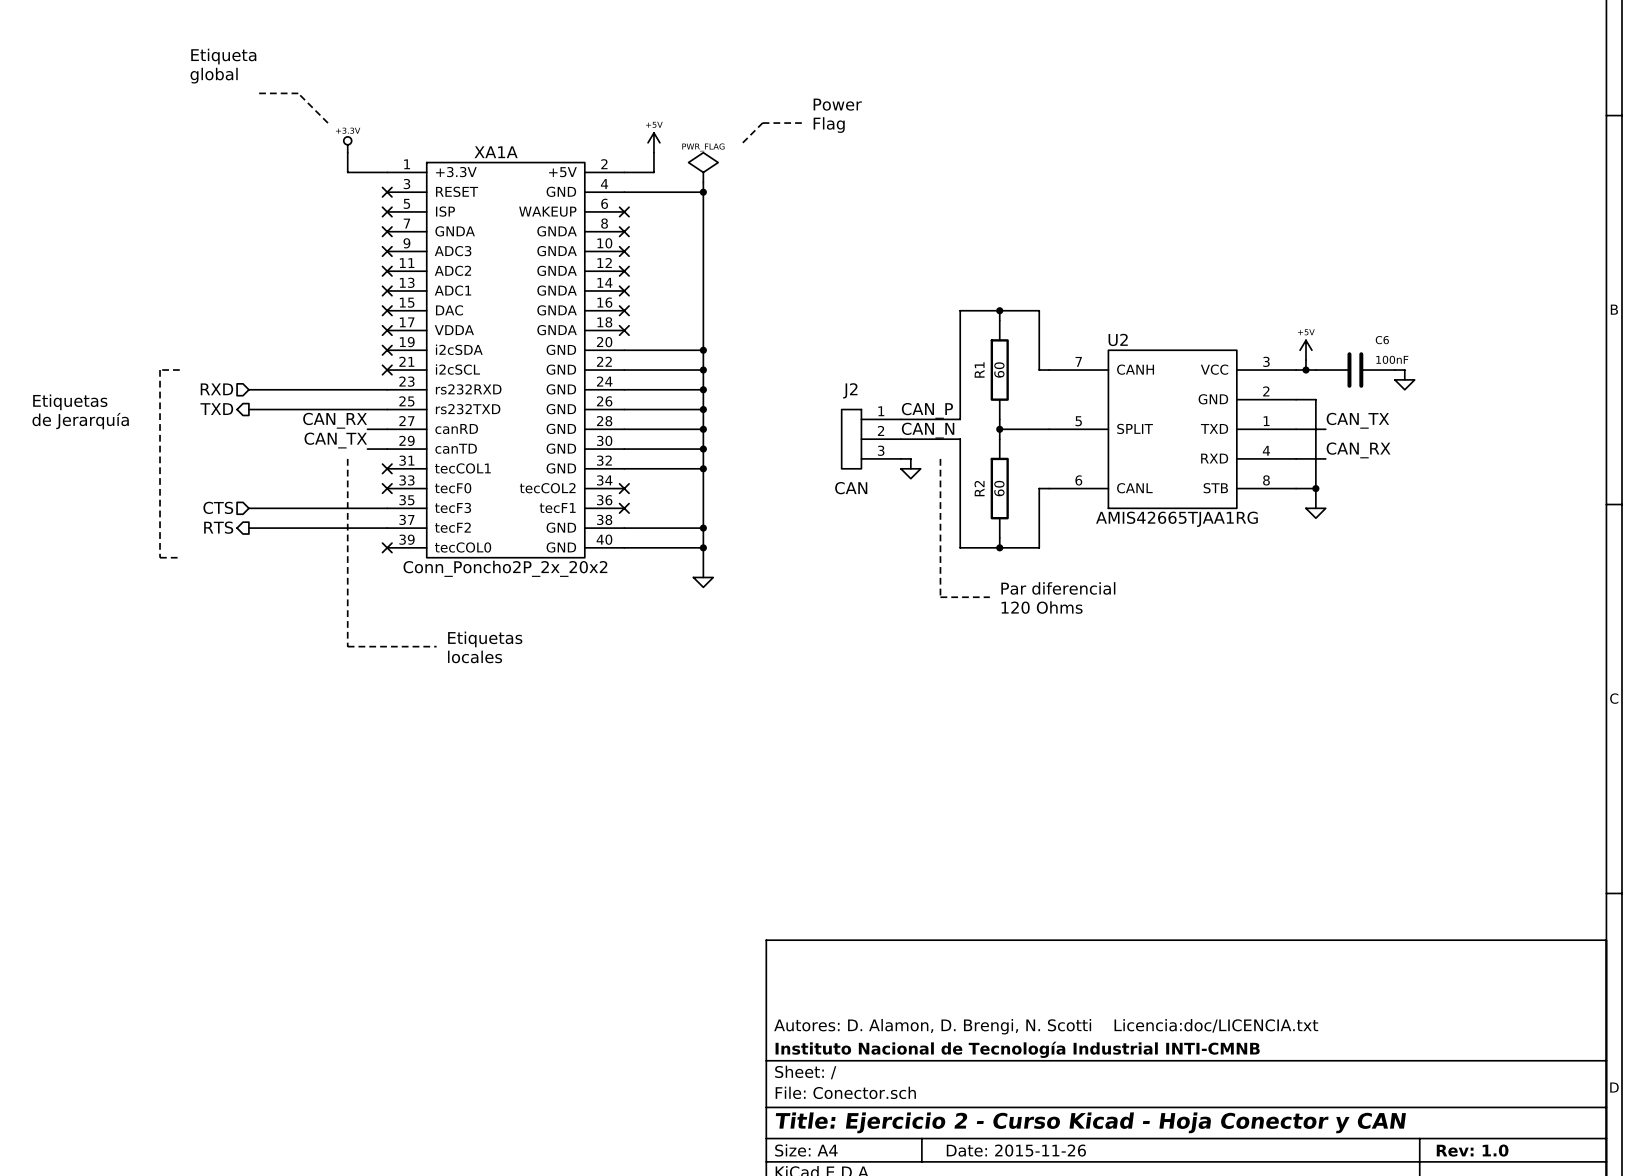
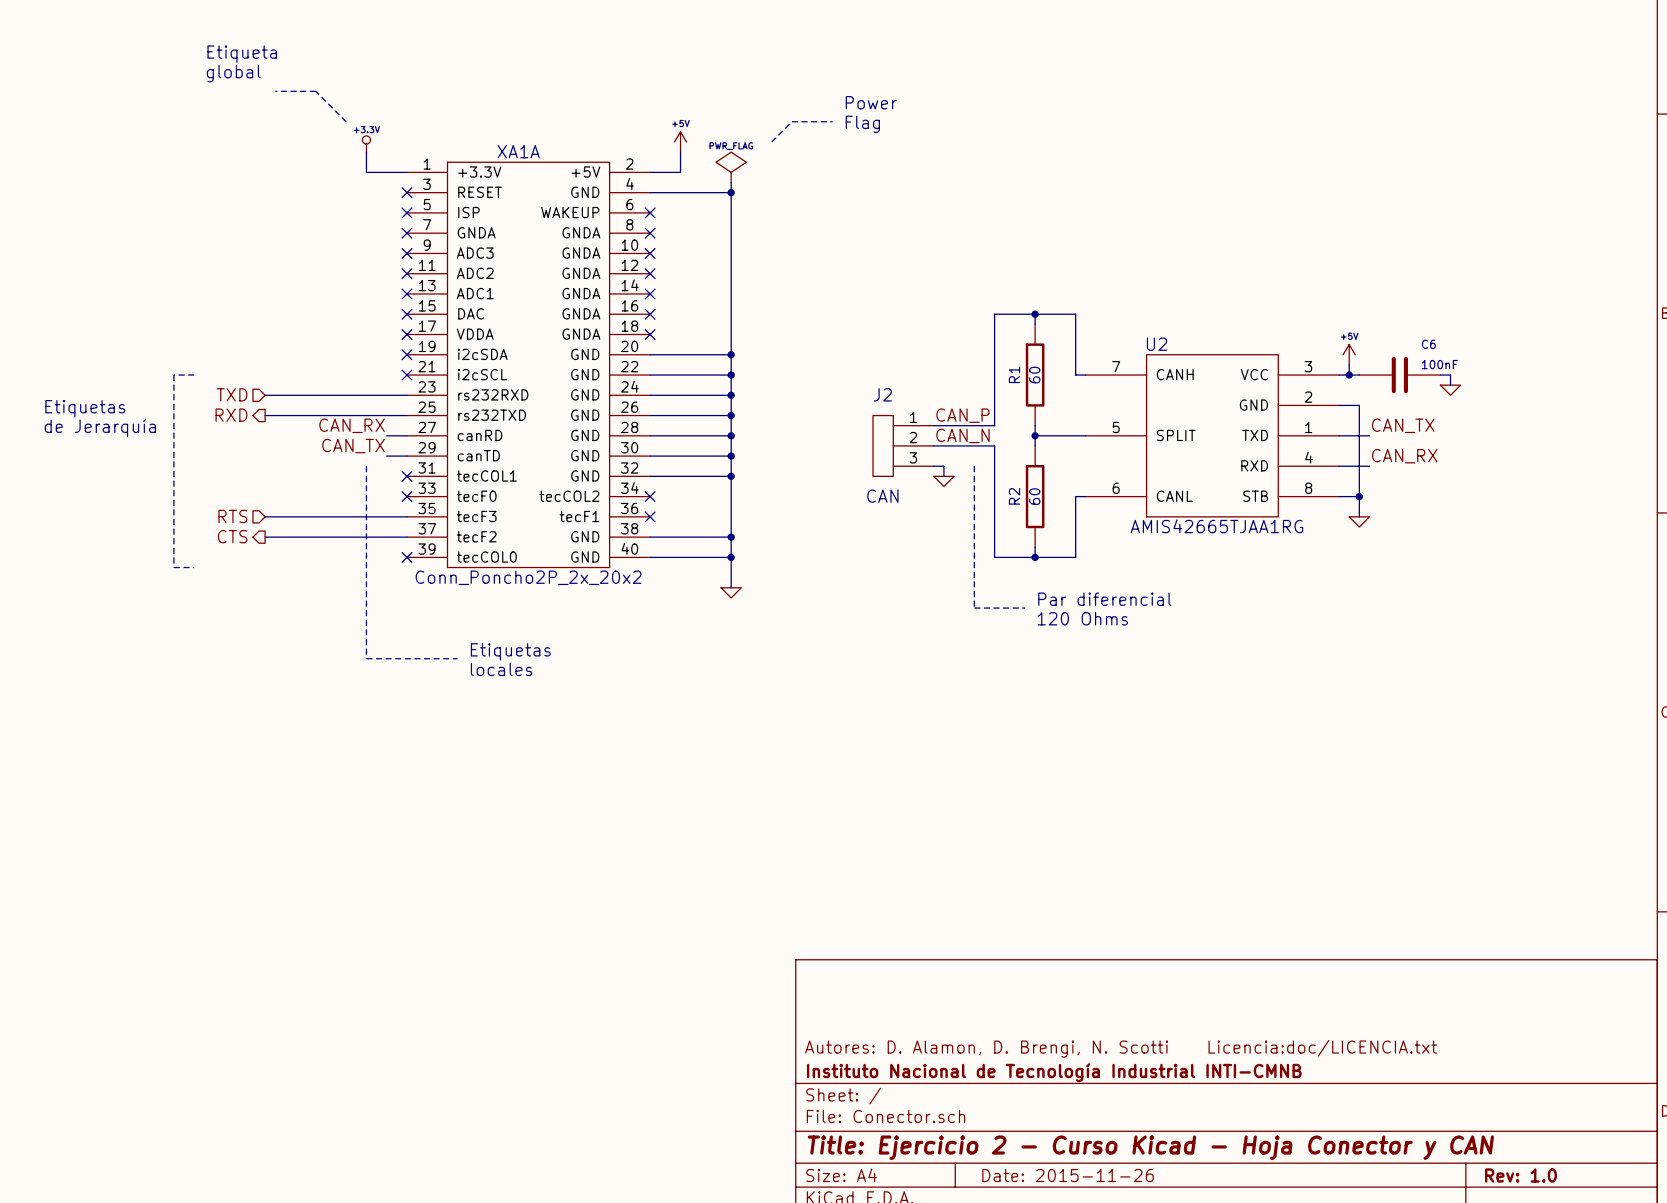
hierarchical label: RXD (216, 389) -> TXD (232, 394)
hierarchical label: TXD (216, 409) -> RXD (231, 415)
hierarchical label: CTS (218, 507) -> RTS (232, 516)
hierarchical label: RTS (218, 527) -> CTS (232, 536)

